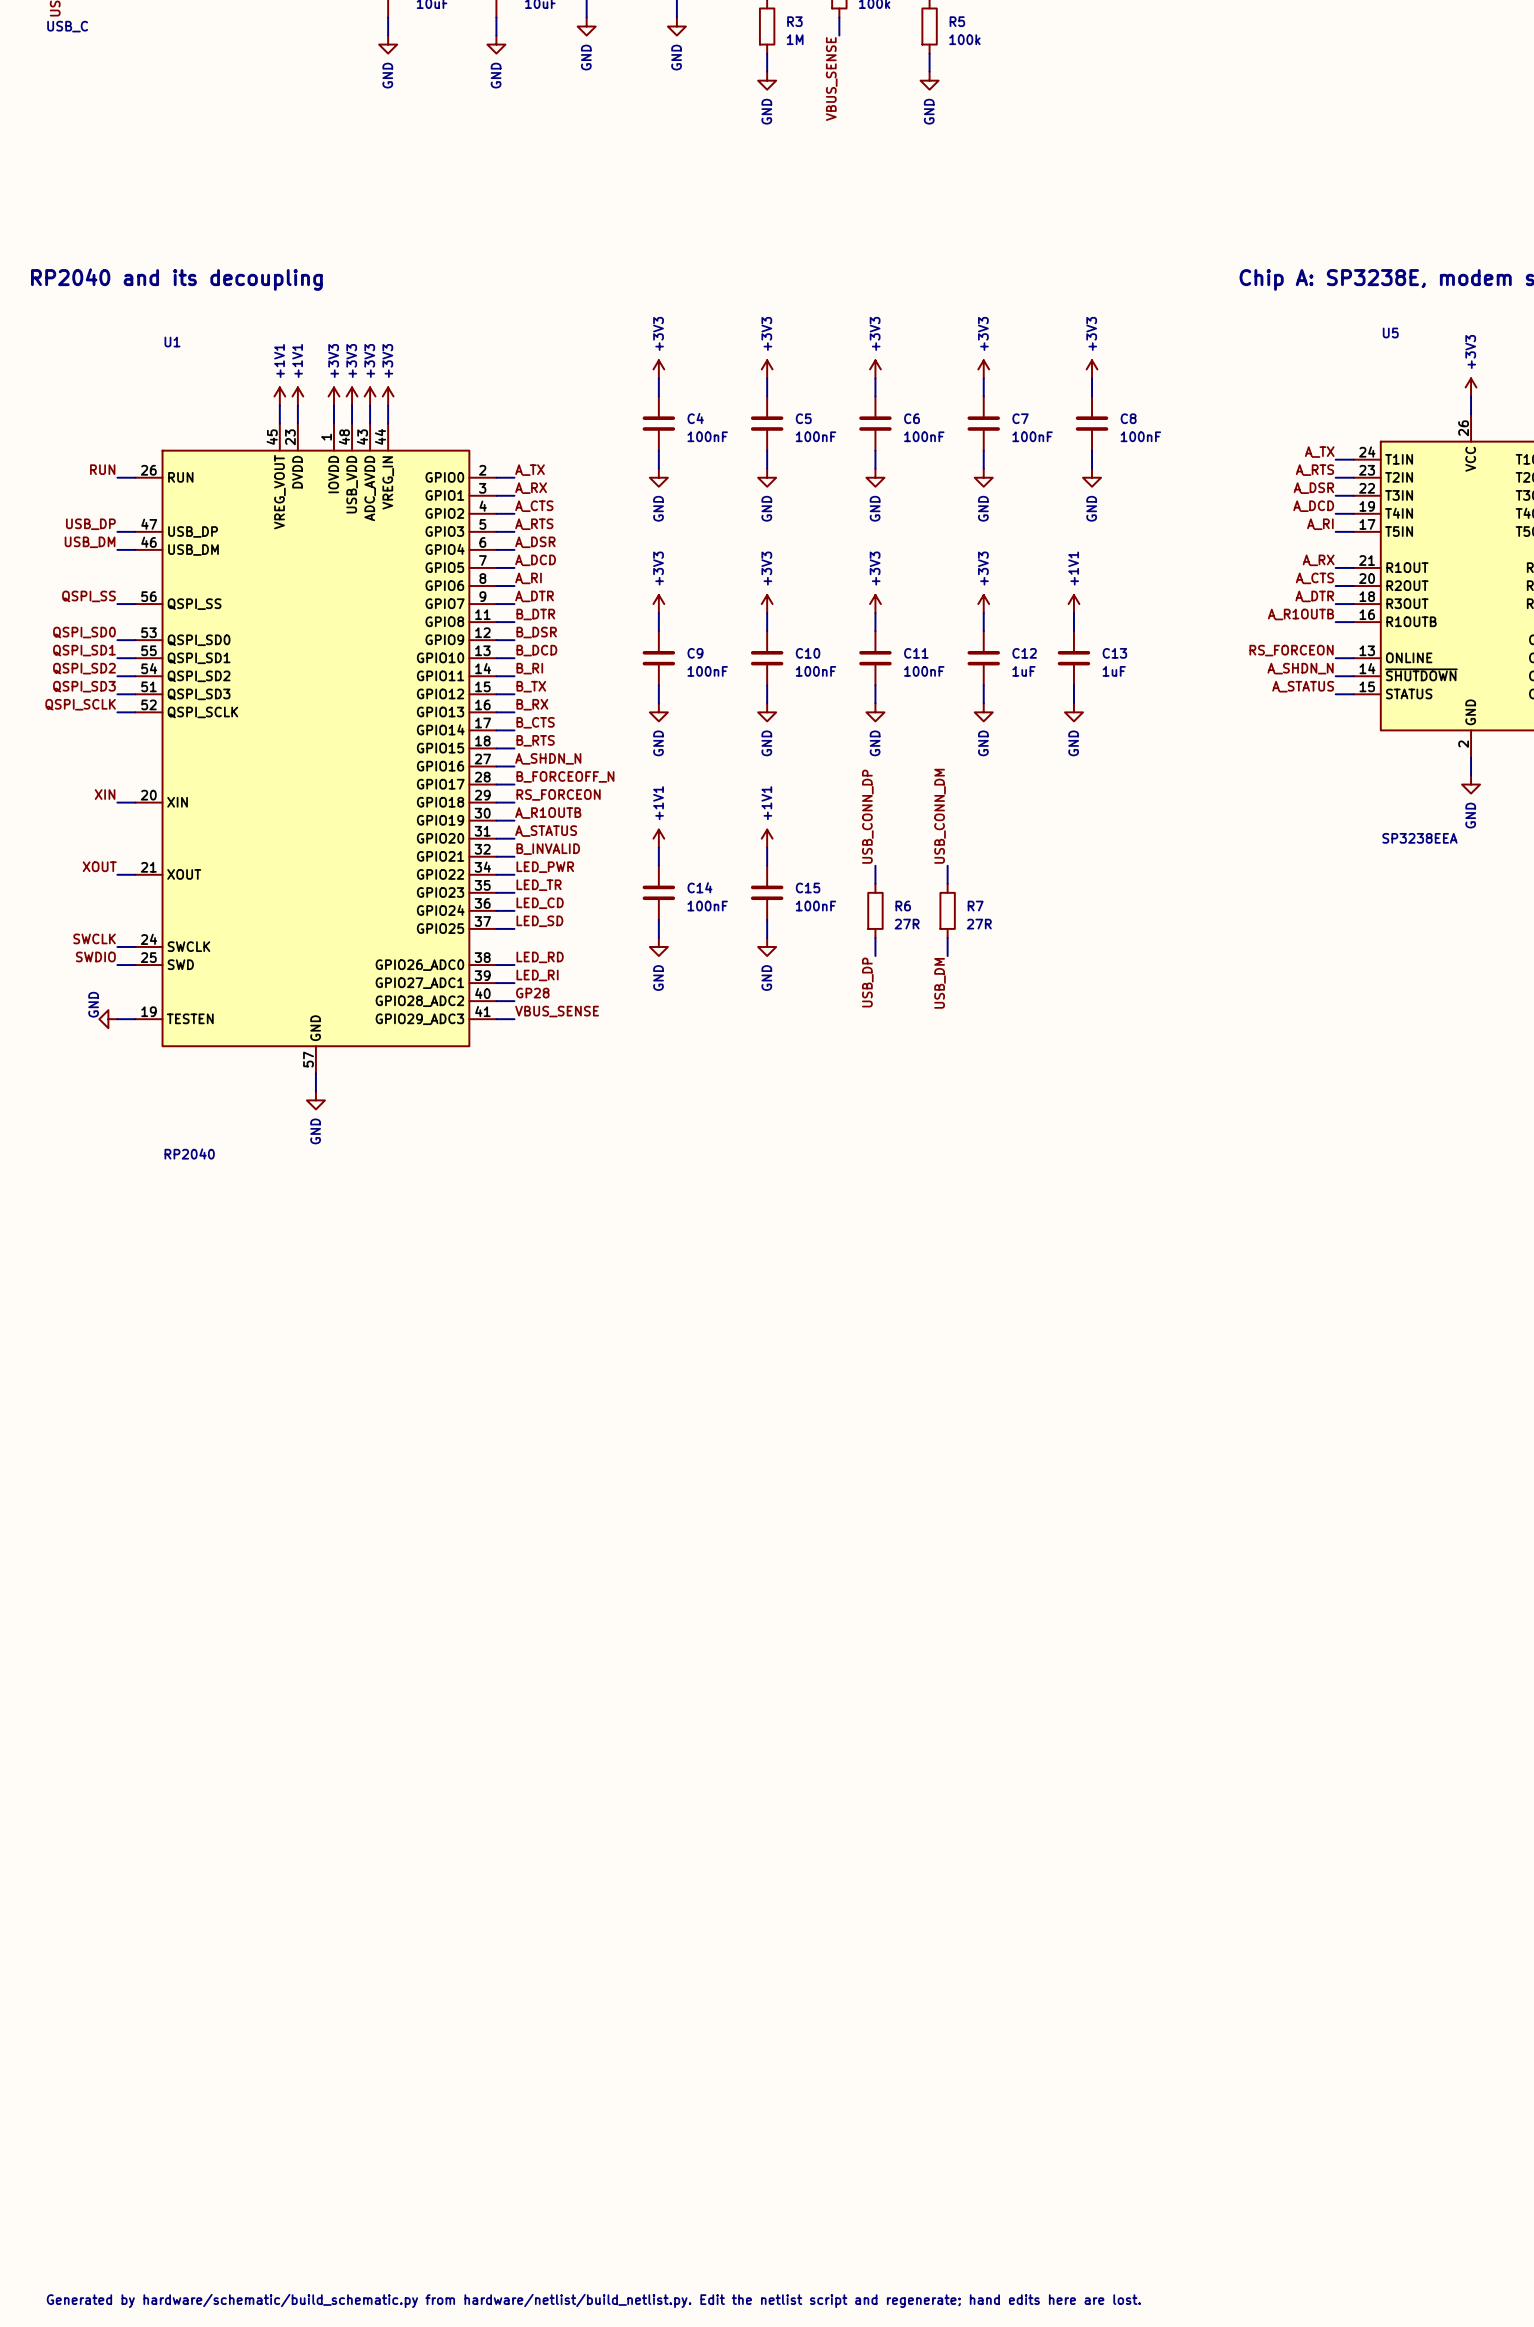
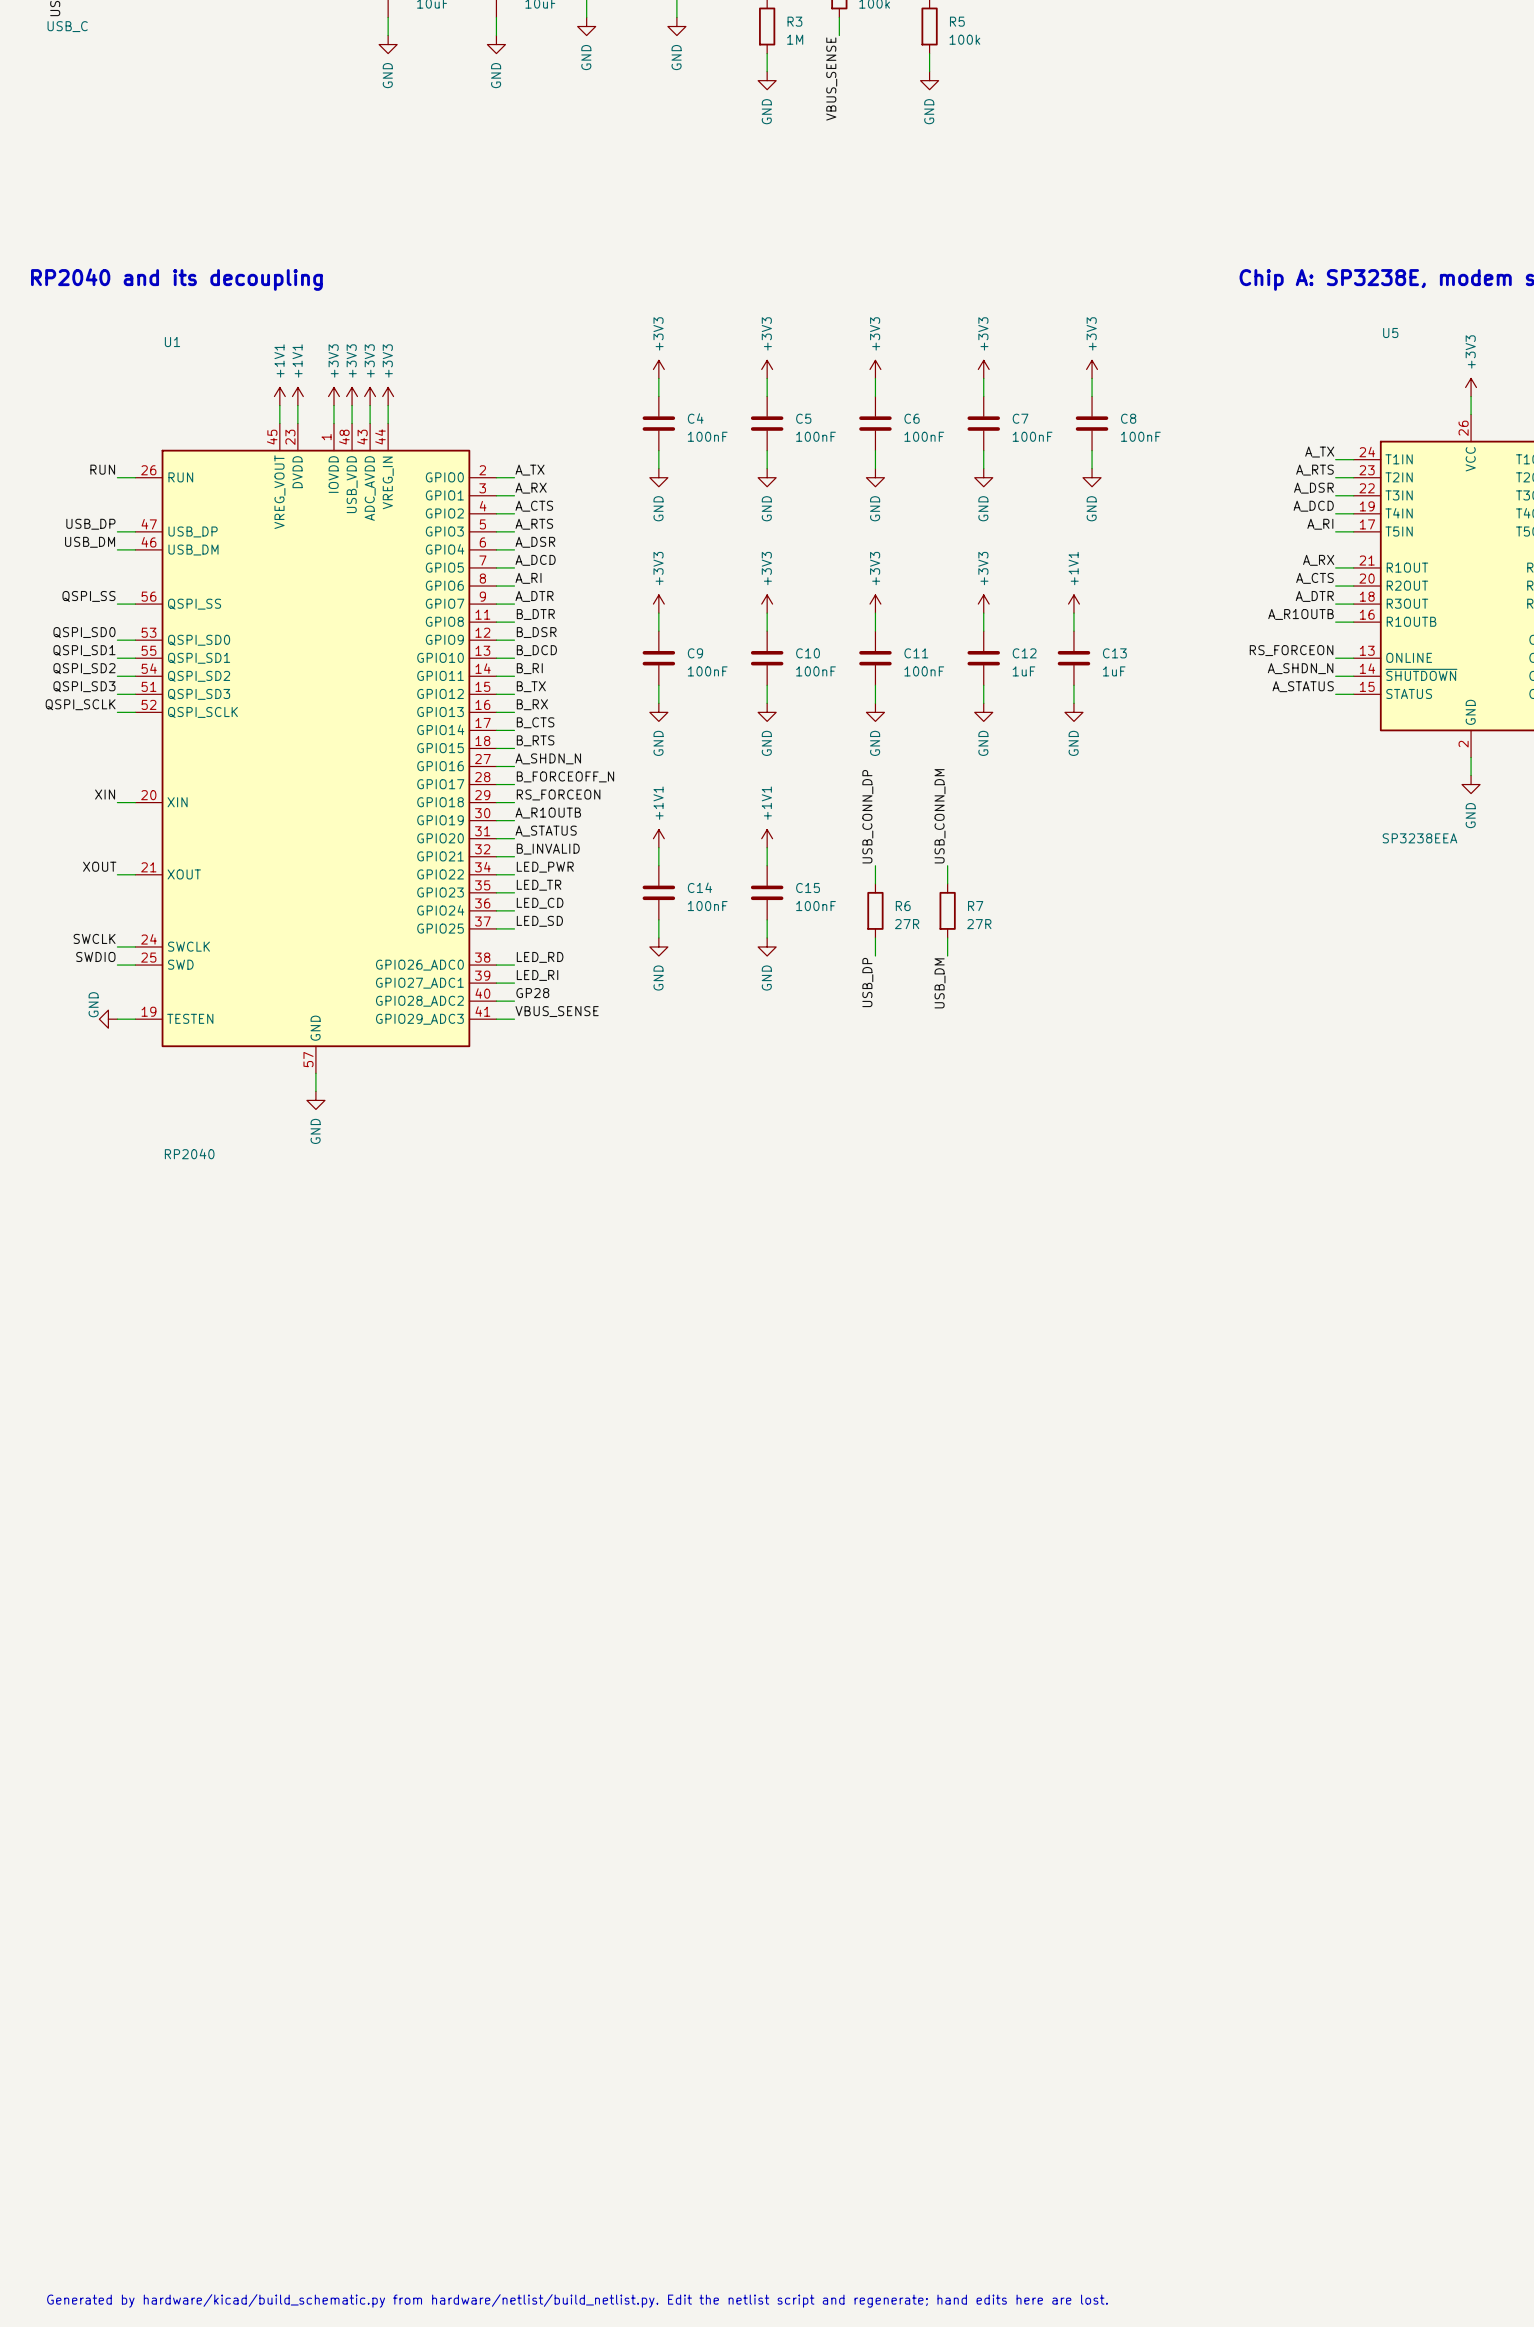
text: Generated by hardware/schematic/build_schematic.py from hardware/netlist/build_netlist.py. Edit the netlist script and regenerate; hand edits here are lost. (593, 2300) -> Generated by hardware/kicad/build_schematic.py from hardware/netlist/build_netlist.py. Edit the netlist script and regenerate; hand edits here are lost. (577, 2300)

